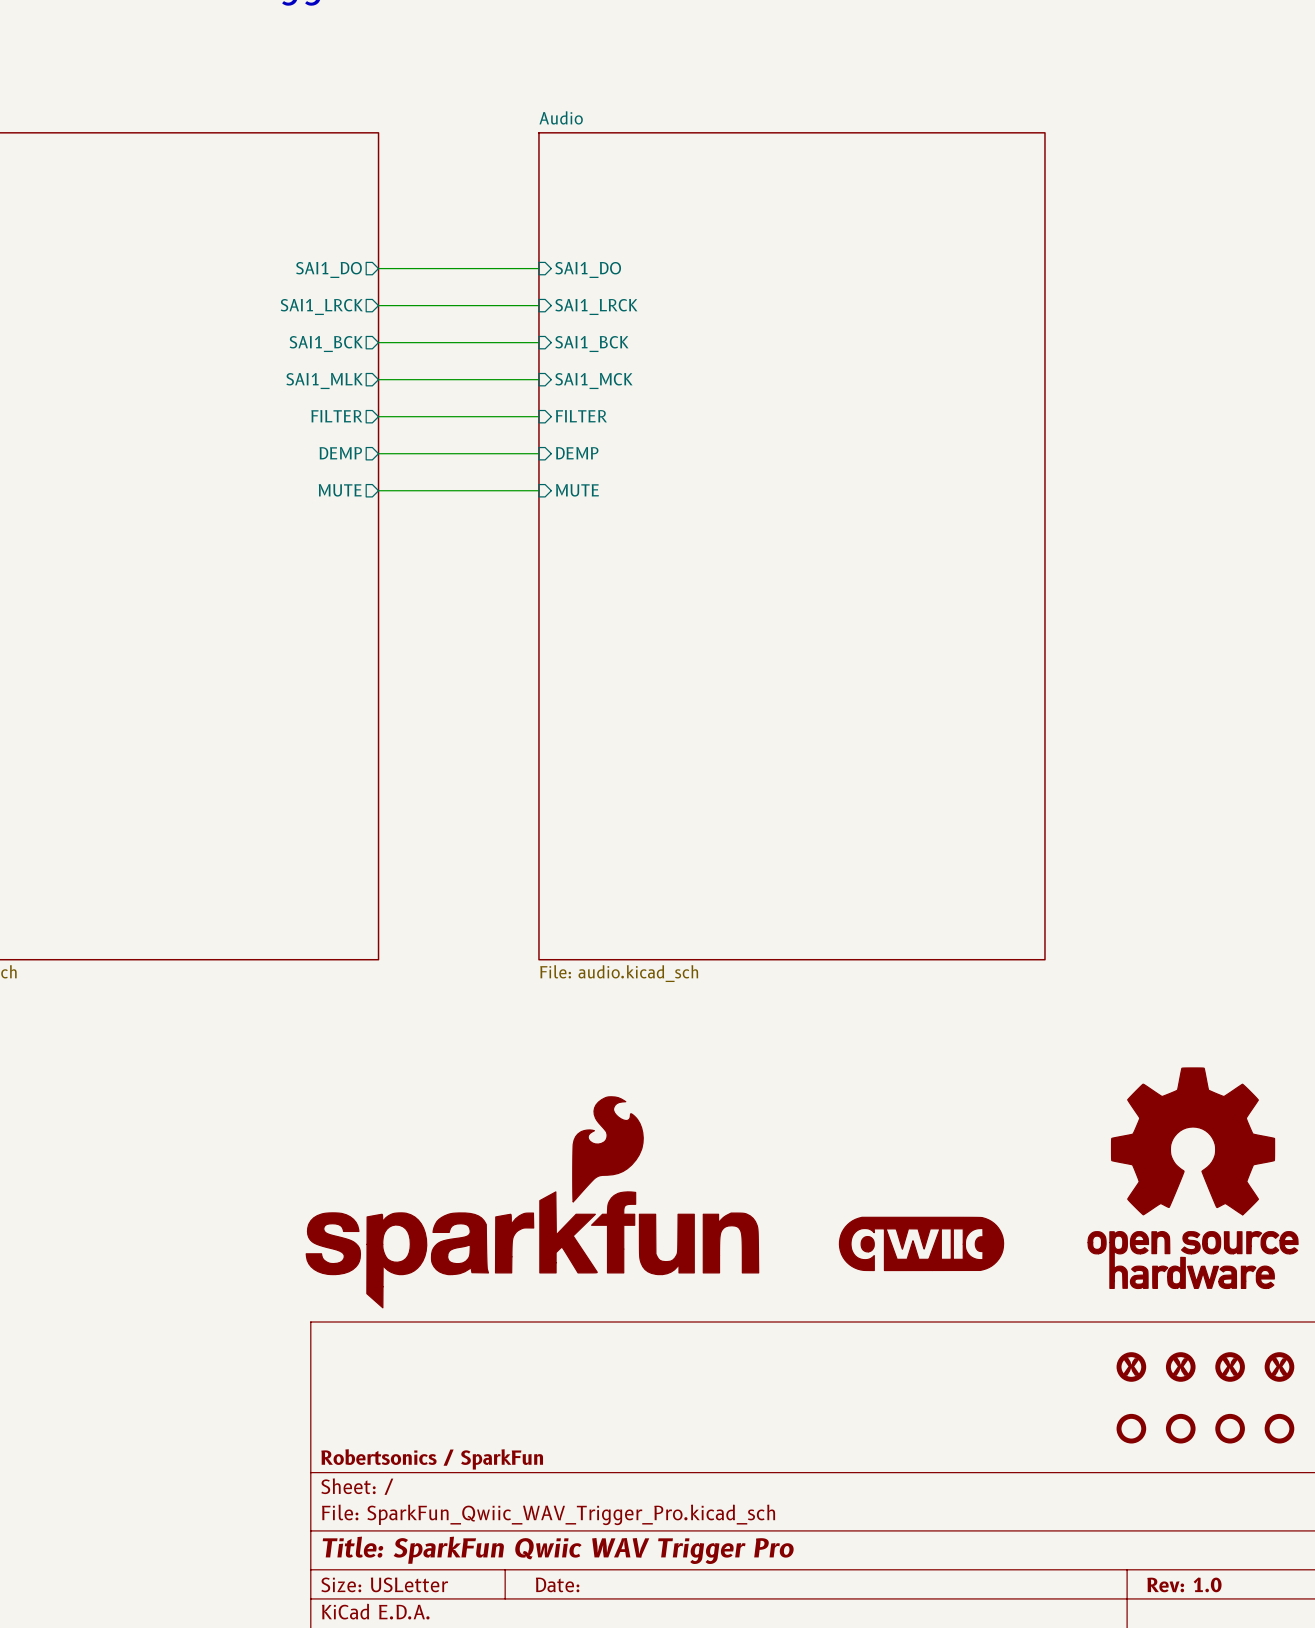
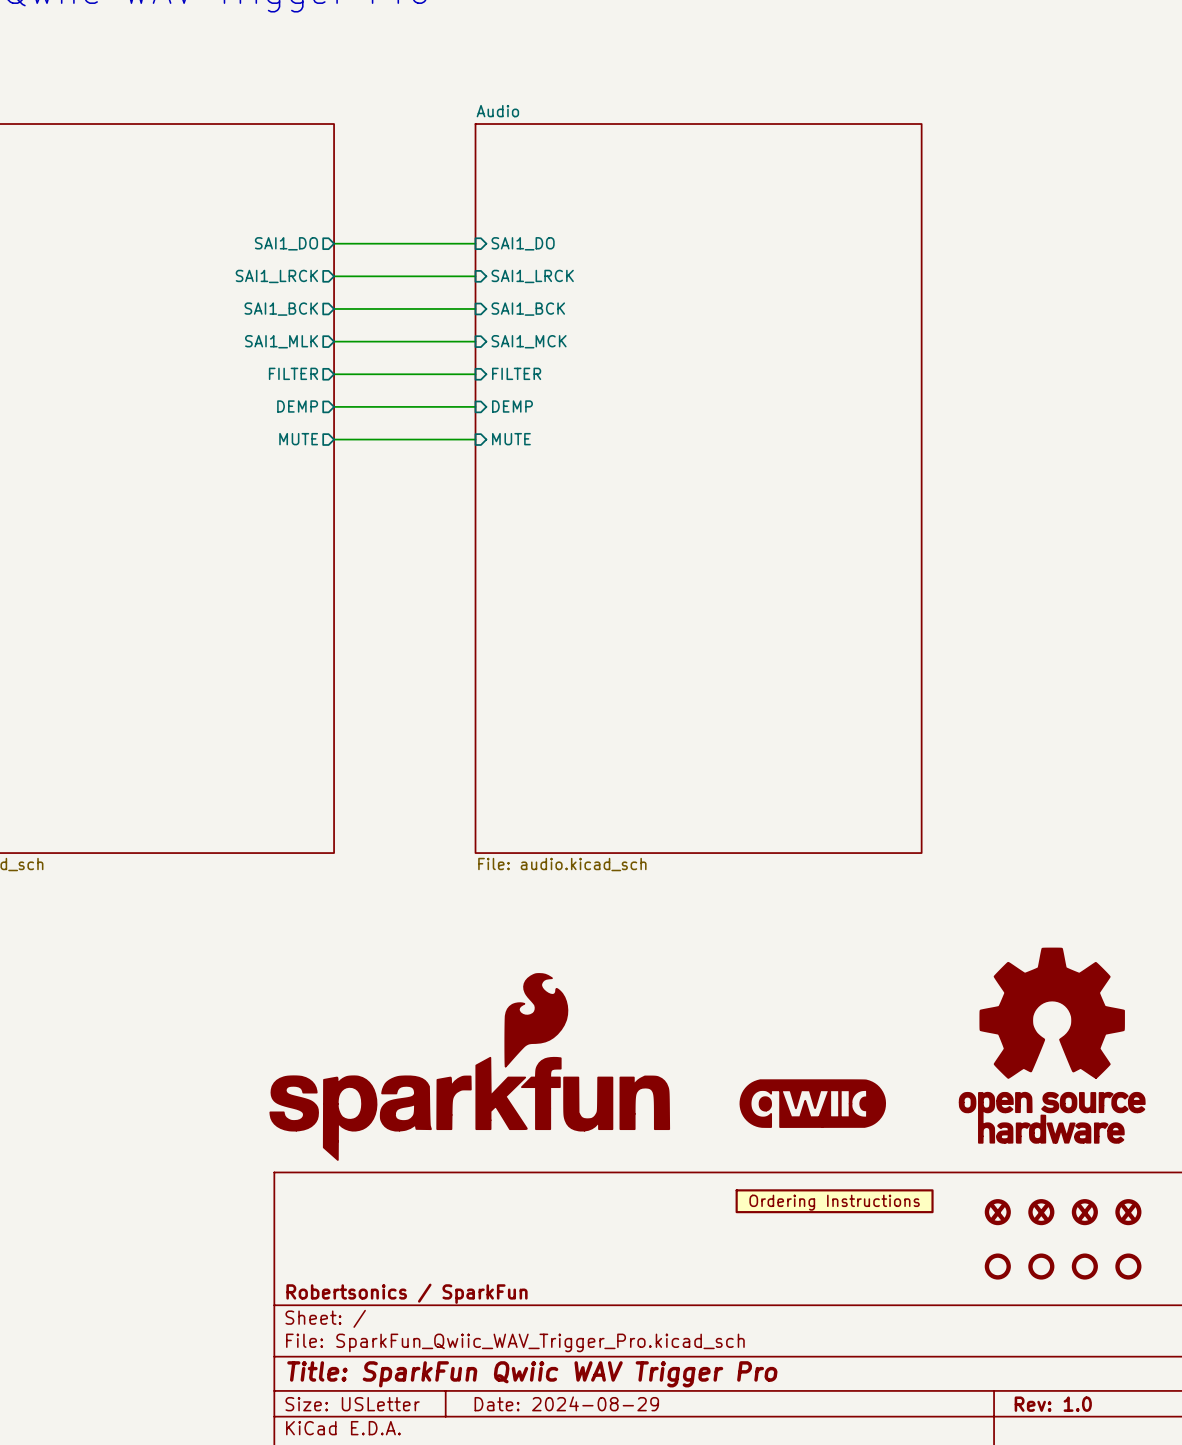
part: none -> (834, 1201)
title block: Date: (557, 1584) -> Date: 2024-08-29 (566, 1403)

